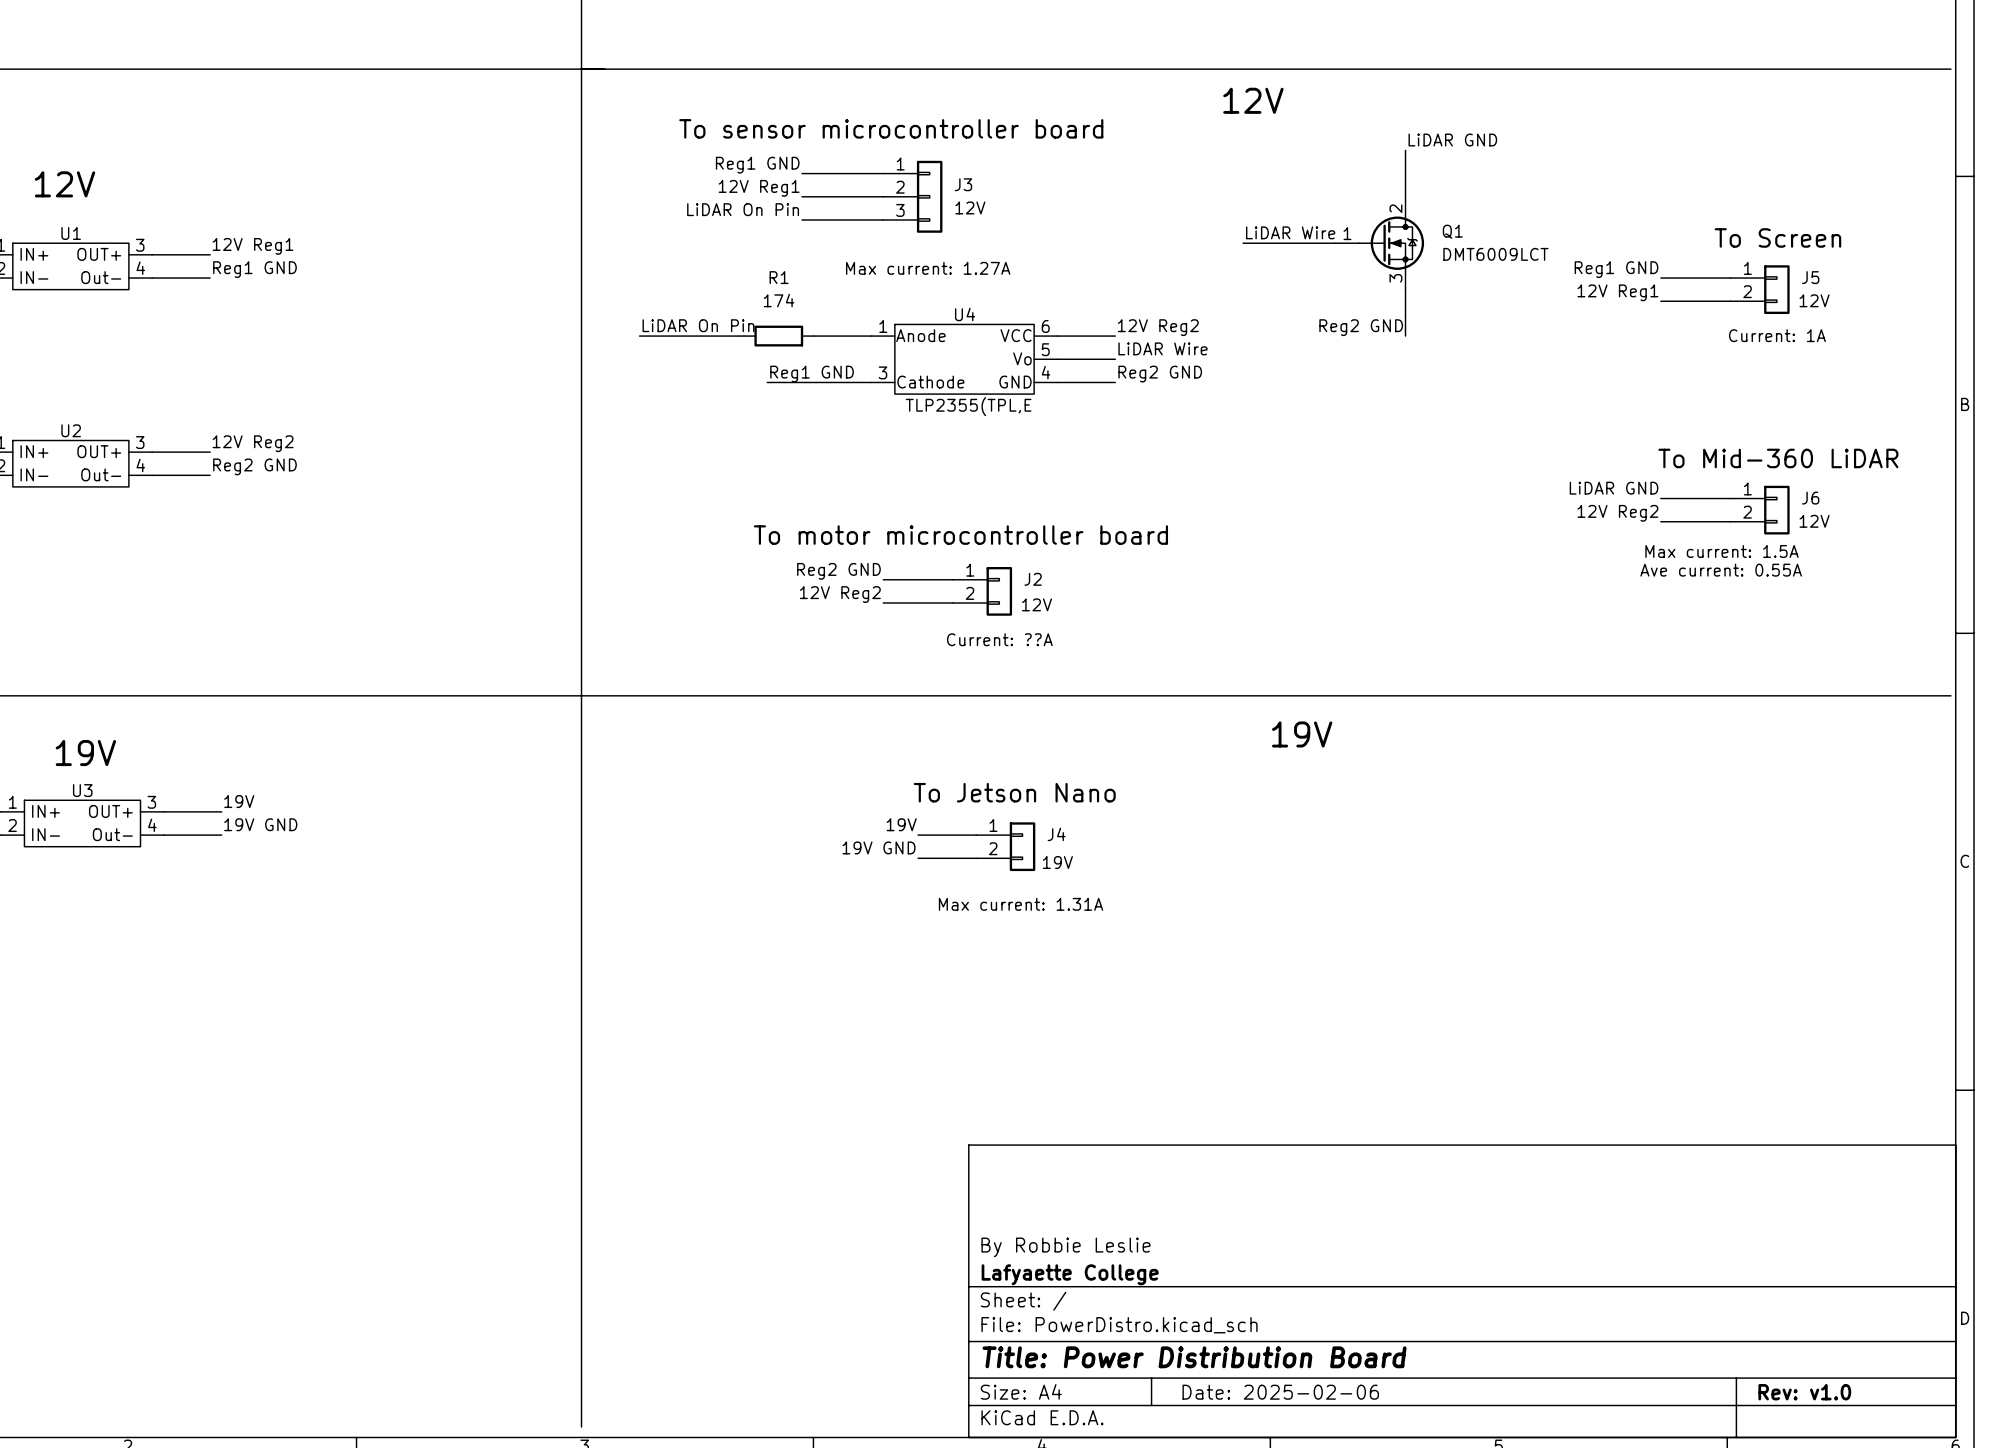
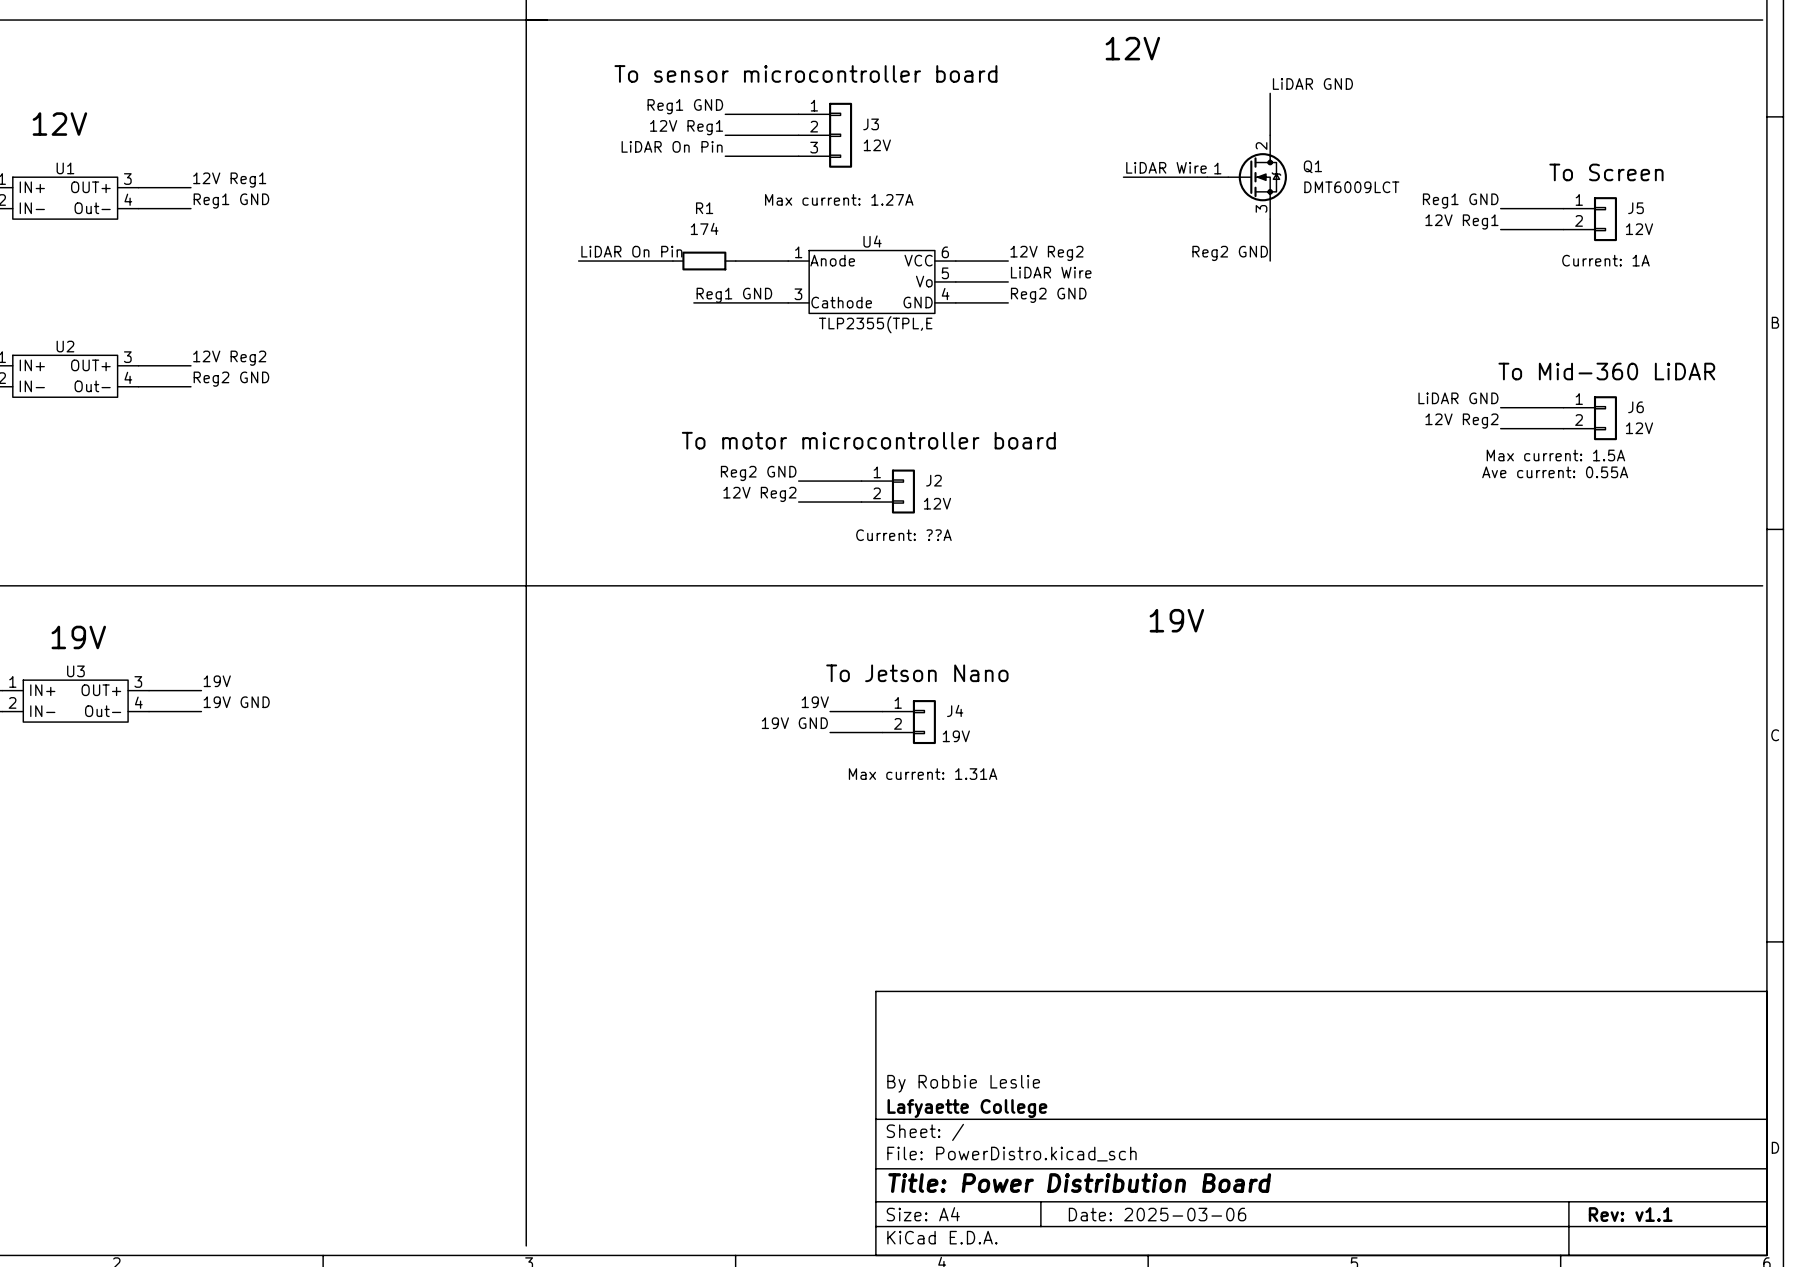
title block: Date: 2025-02-06 (1280, 1392) -> Date: 2025-03-06 (1157, 1214)
title block: Rev: v1.0 (1804, 1392) -> Rev: v1.1 (1630, 1214)

